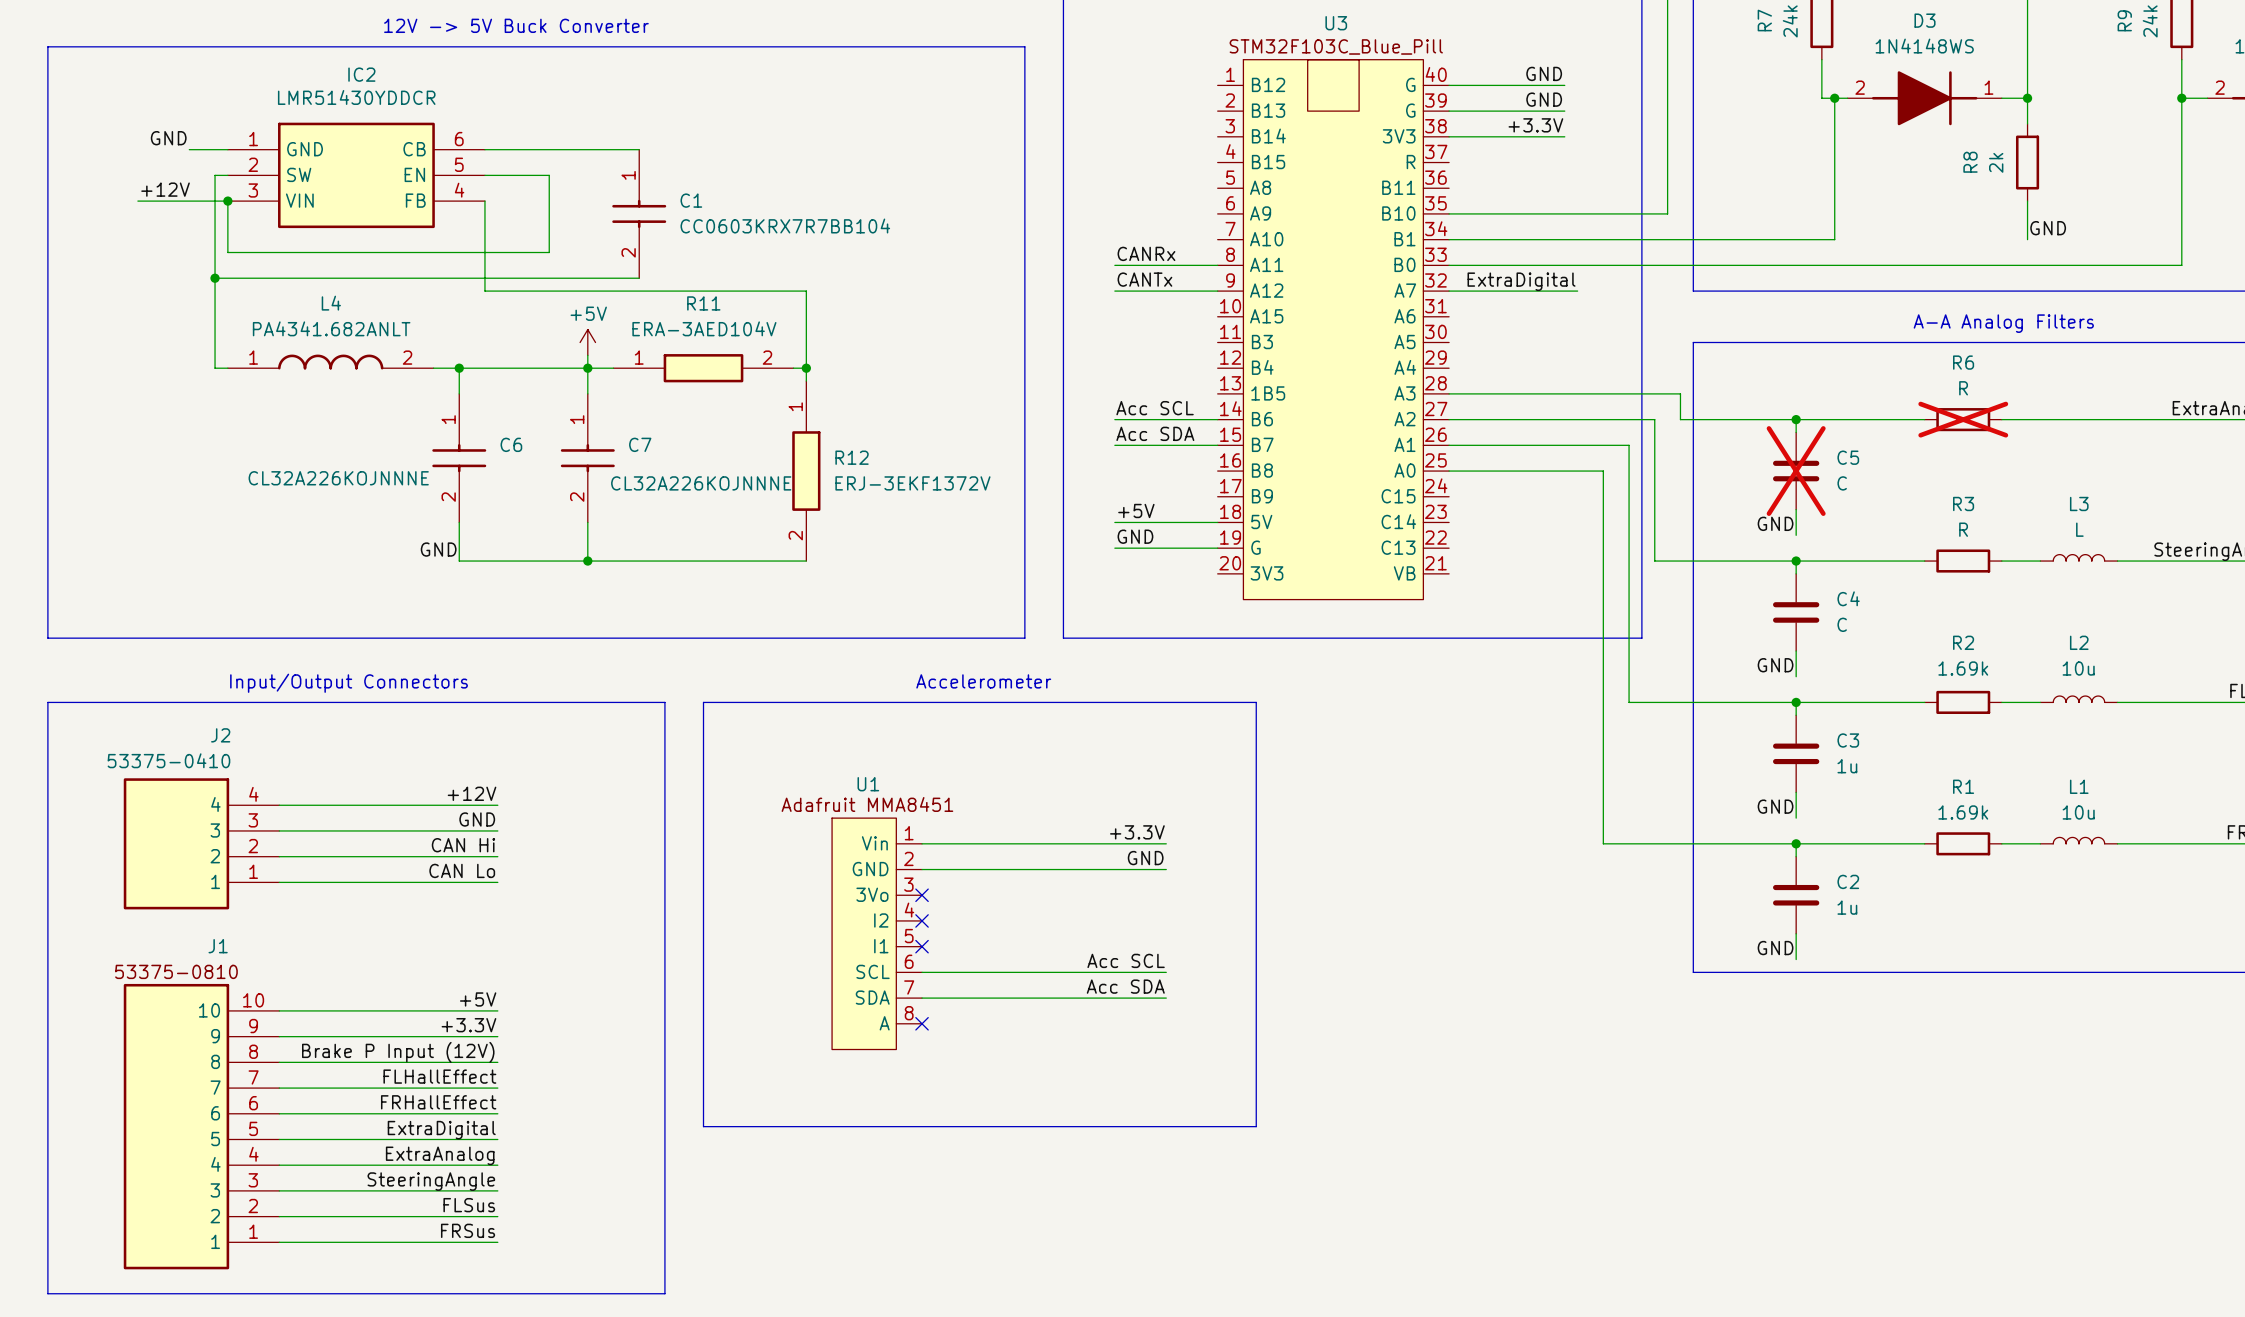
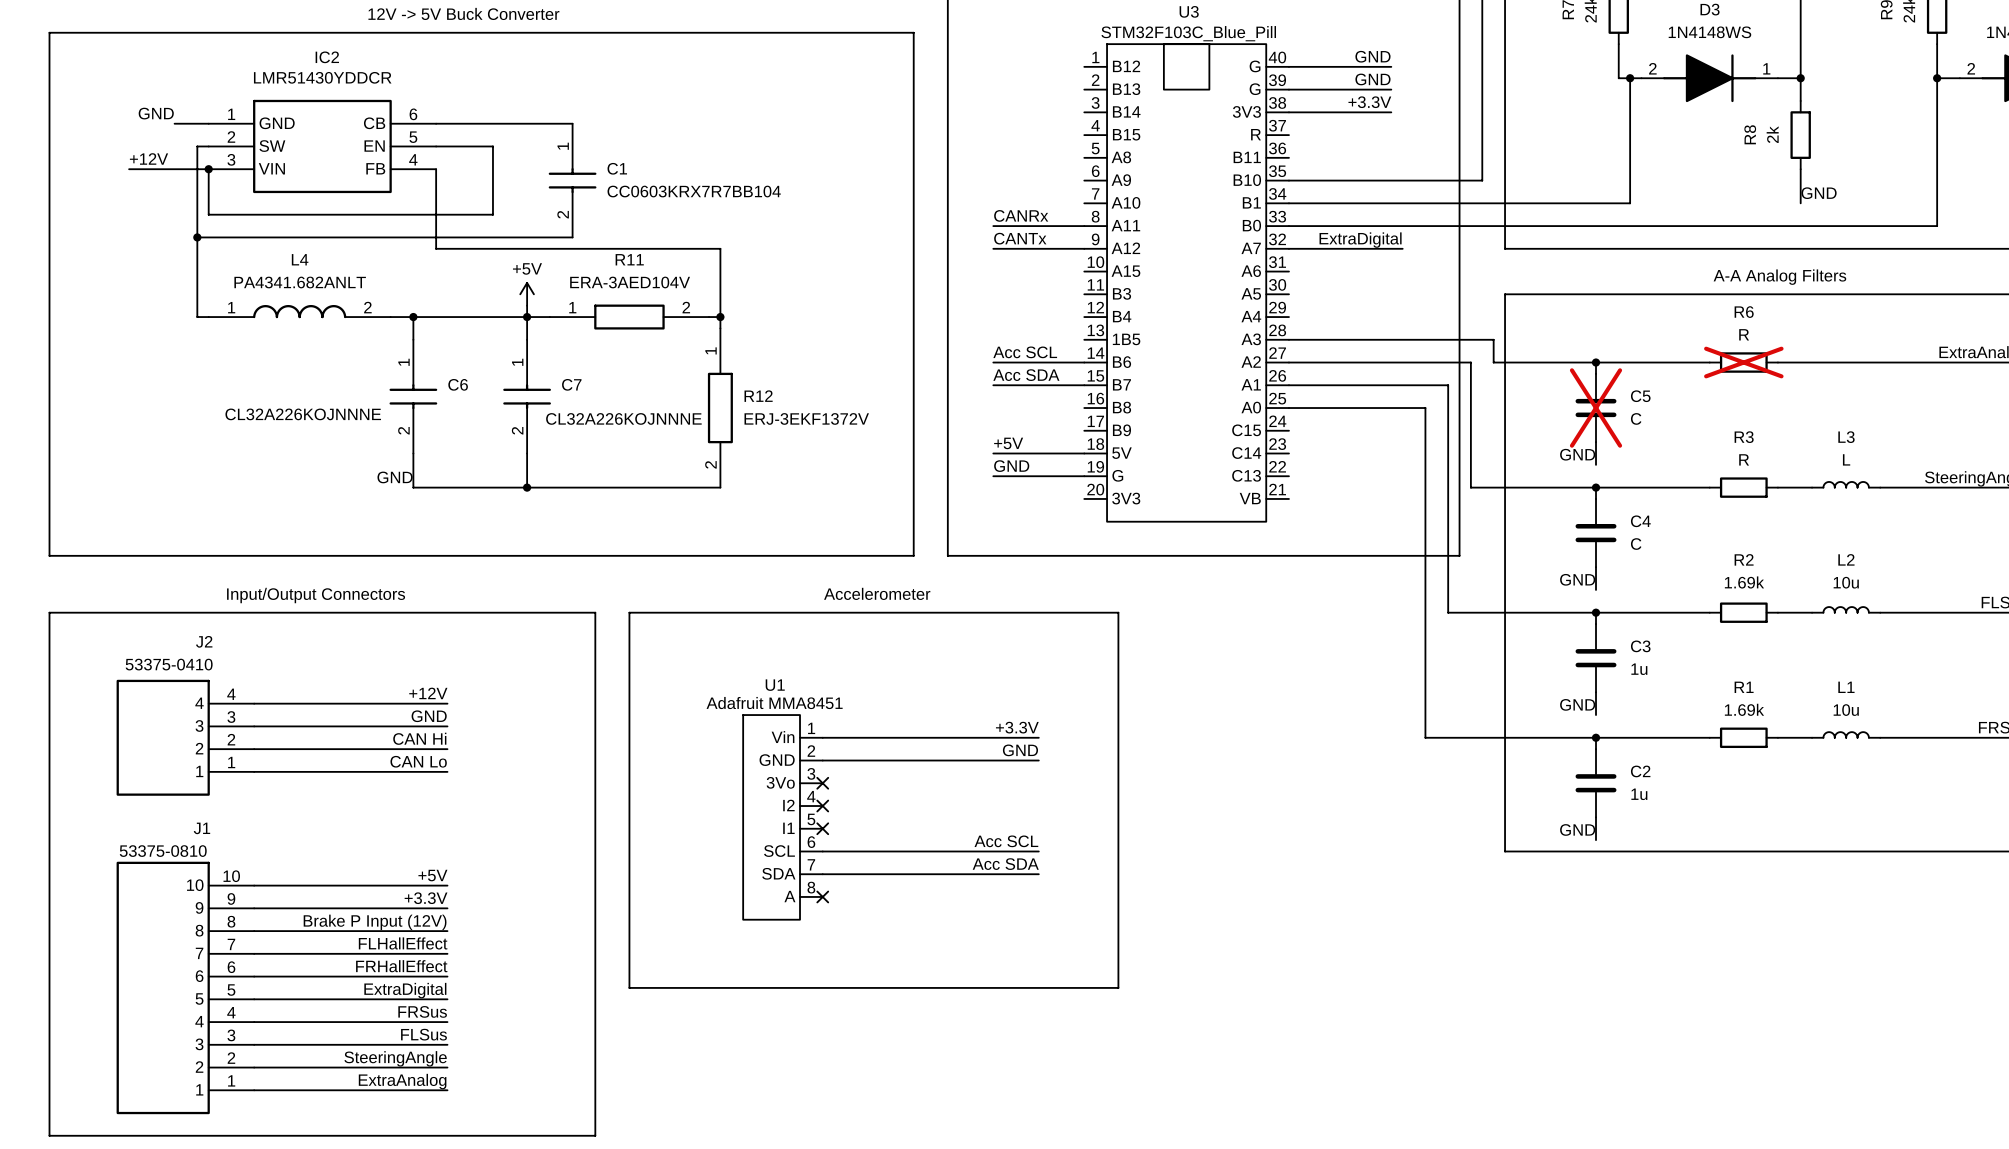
label: ExtraAnalog (440, 1155) -> FRSus (422, 1011)
label: SteeringAngle (431, 1181) -> FLSus (423, 1034)
label: FLSus (469, 1205) -> SteeringAngle (395, 1058)
label: FRSus (468, 1230) -> ExtraAnalog (402, 1081)

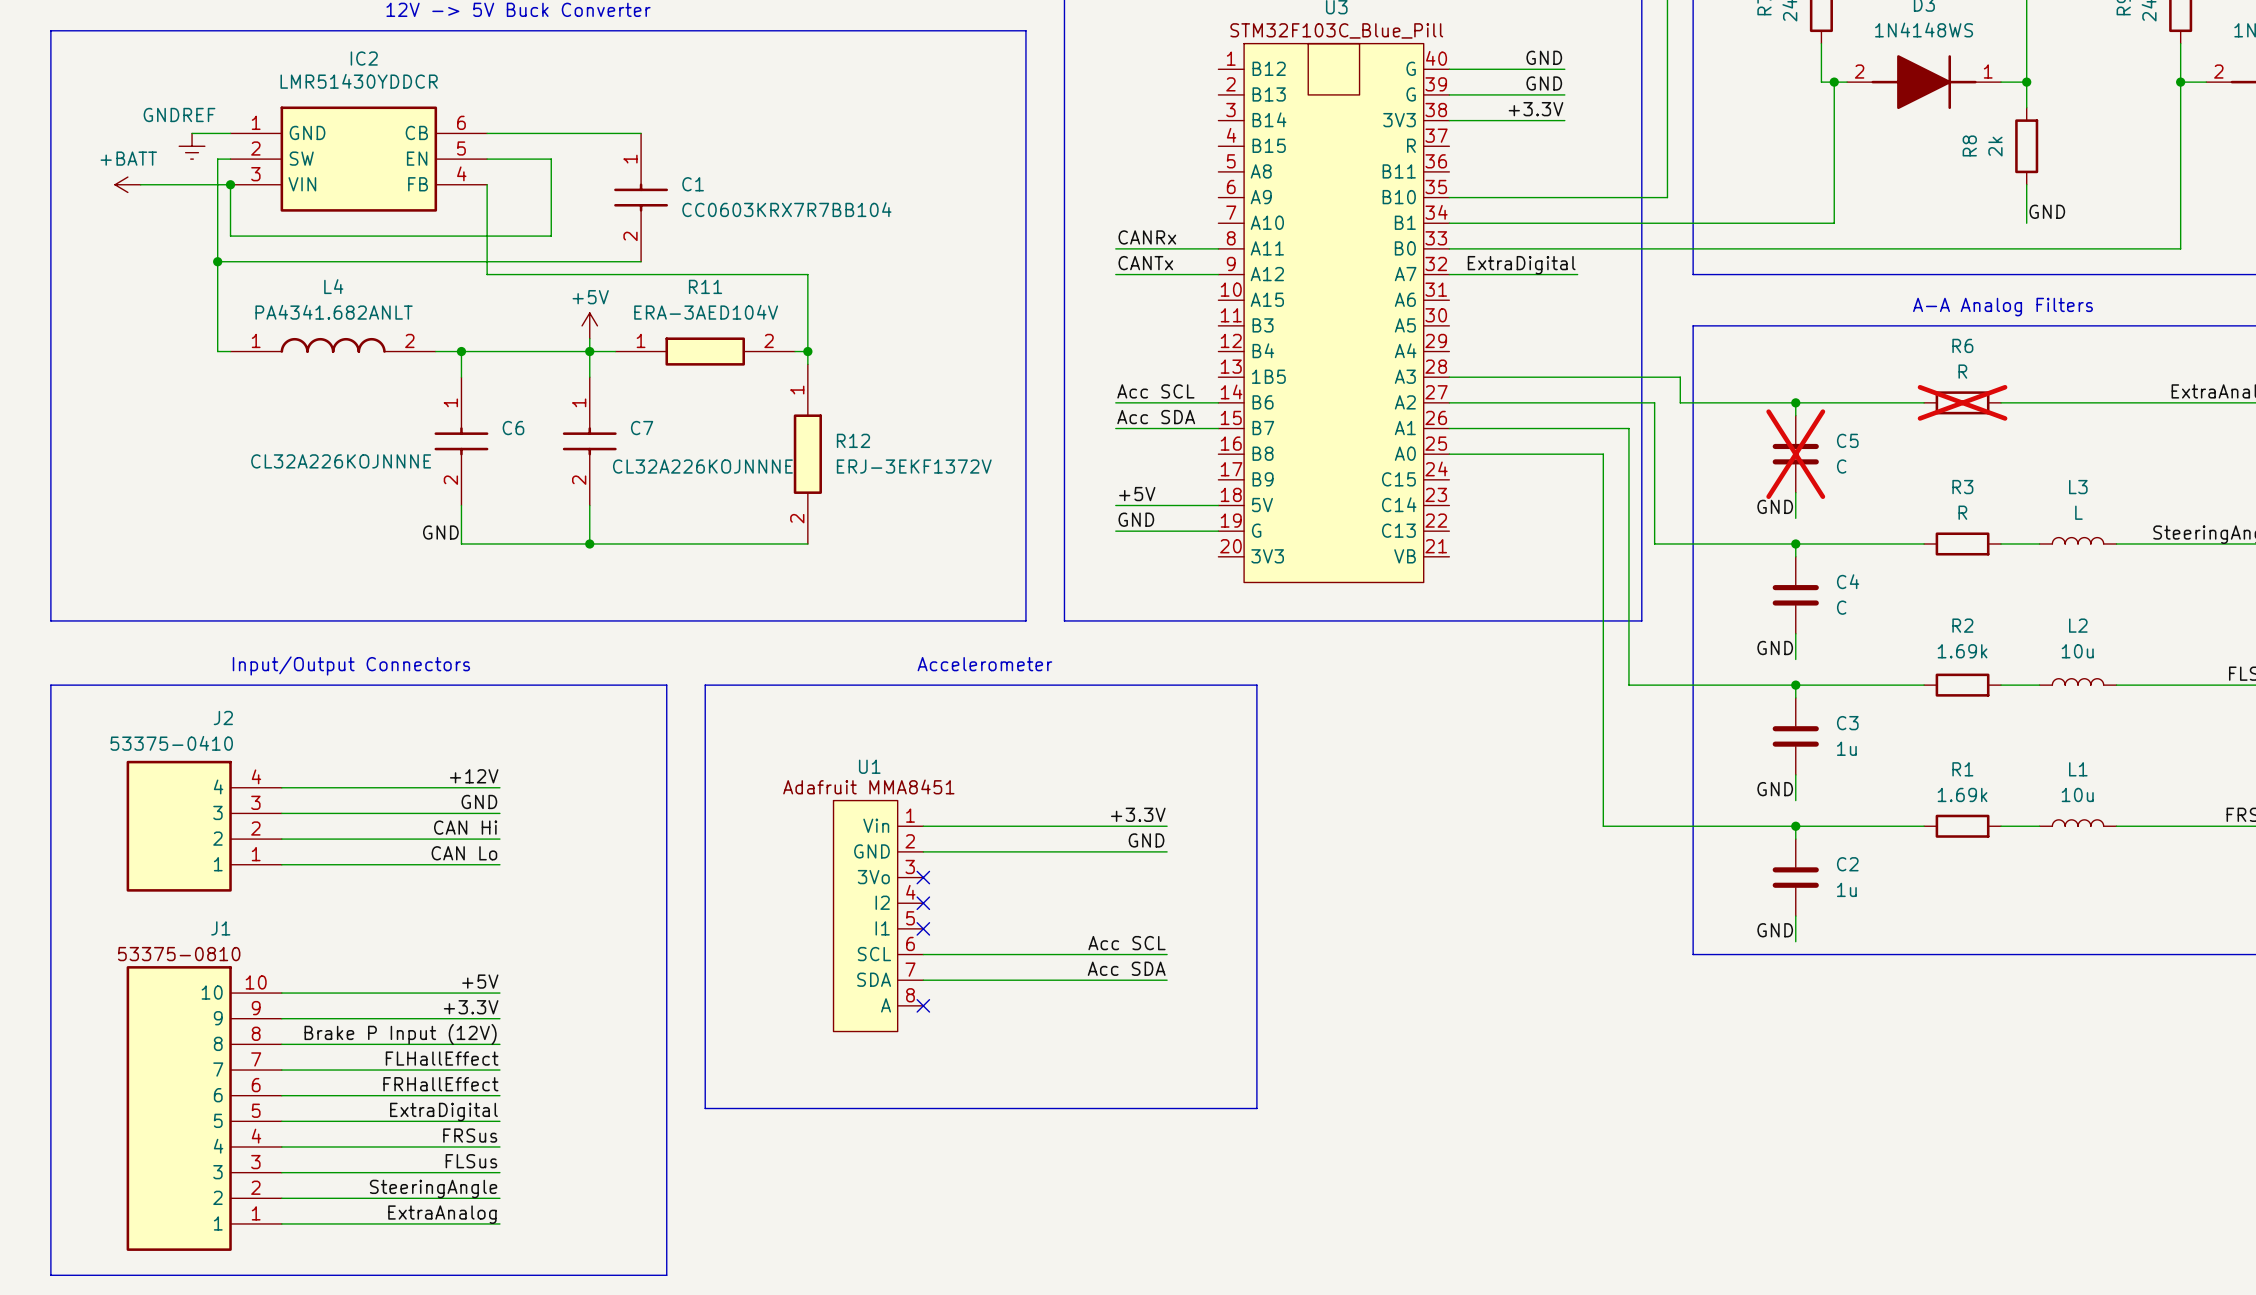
label: GND (156, 113) -> none
power symbol: none -> GNDREF (192, 146)
label: +12V (149, 158) -> none
power symbol: none -> +BATT (127, 184)

